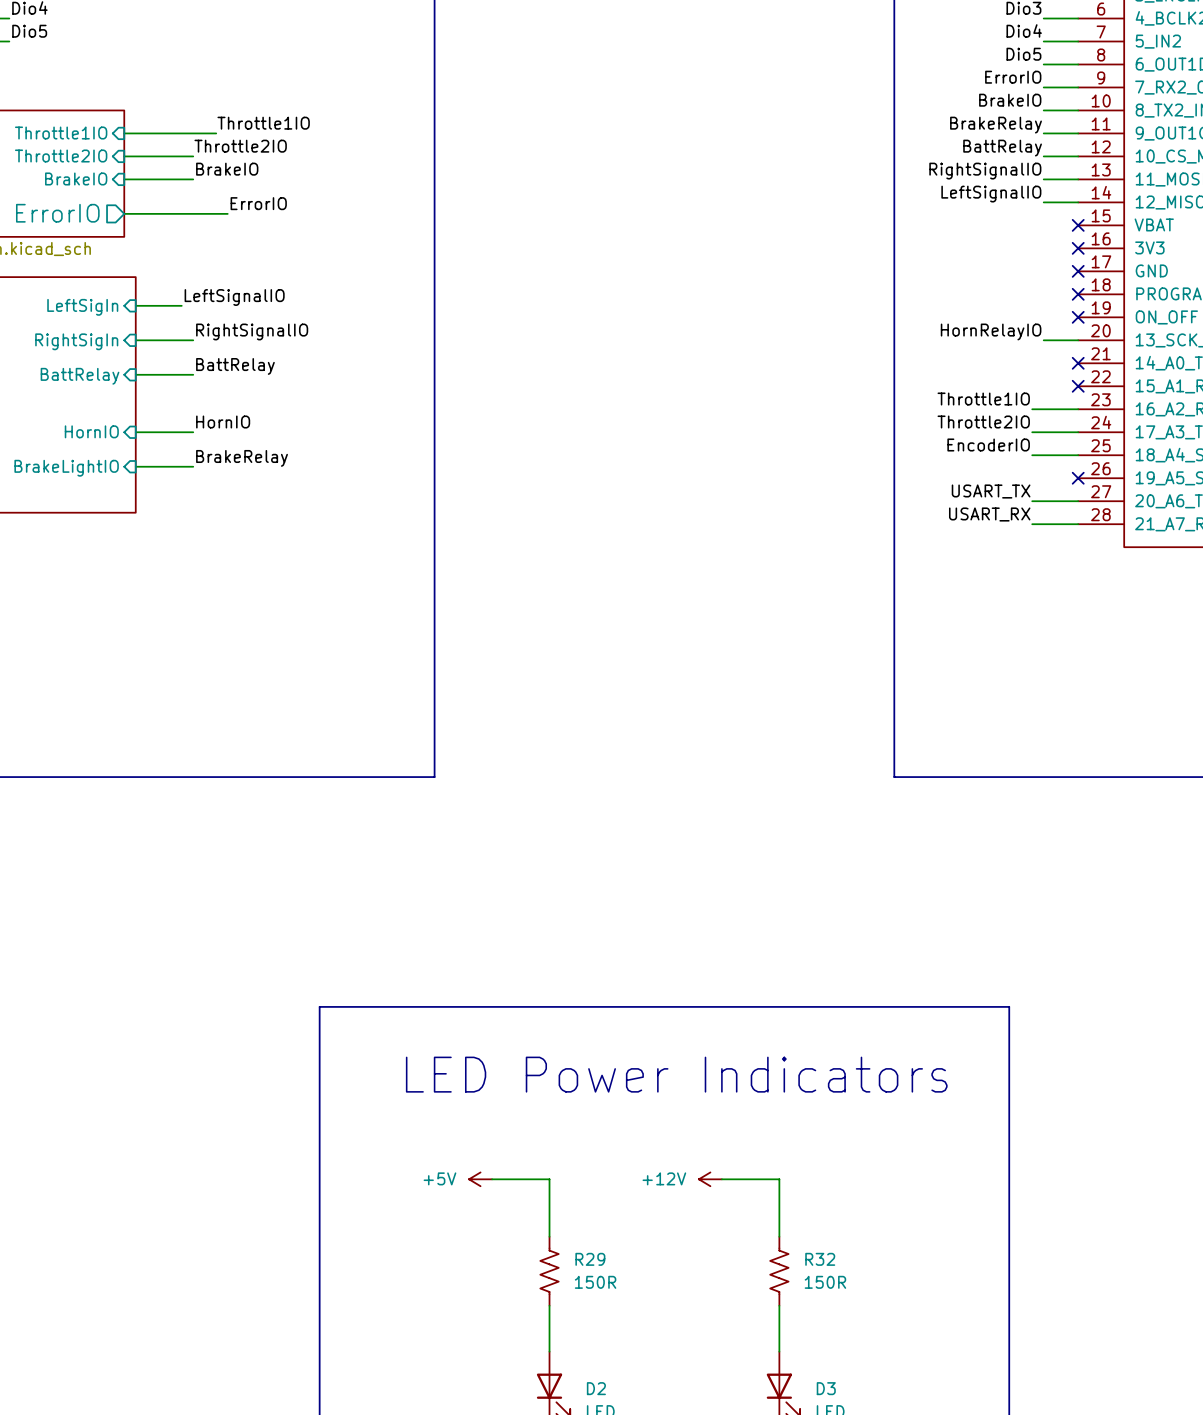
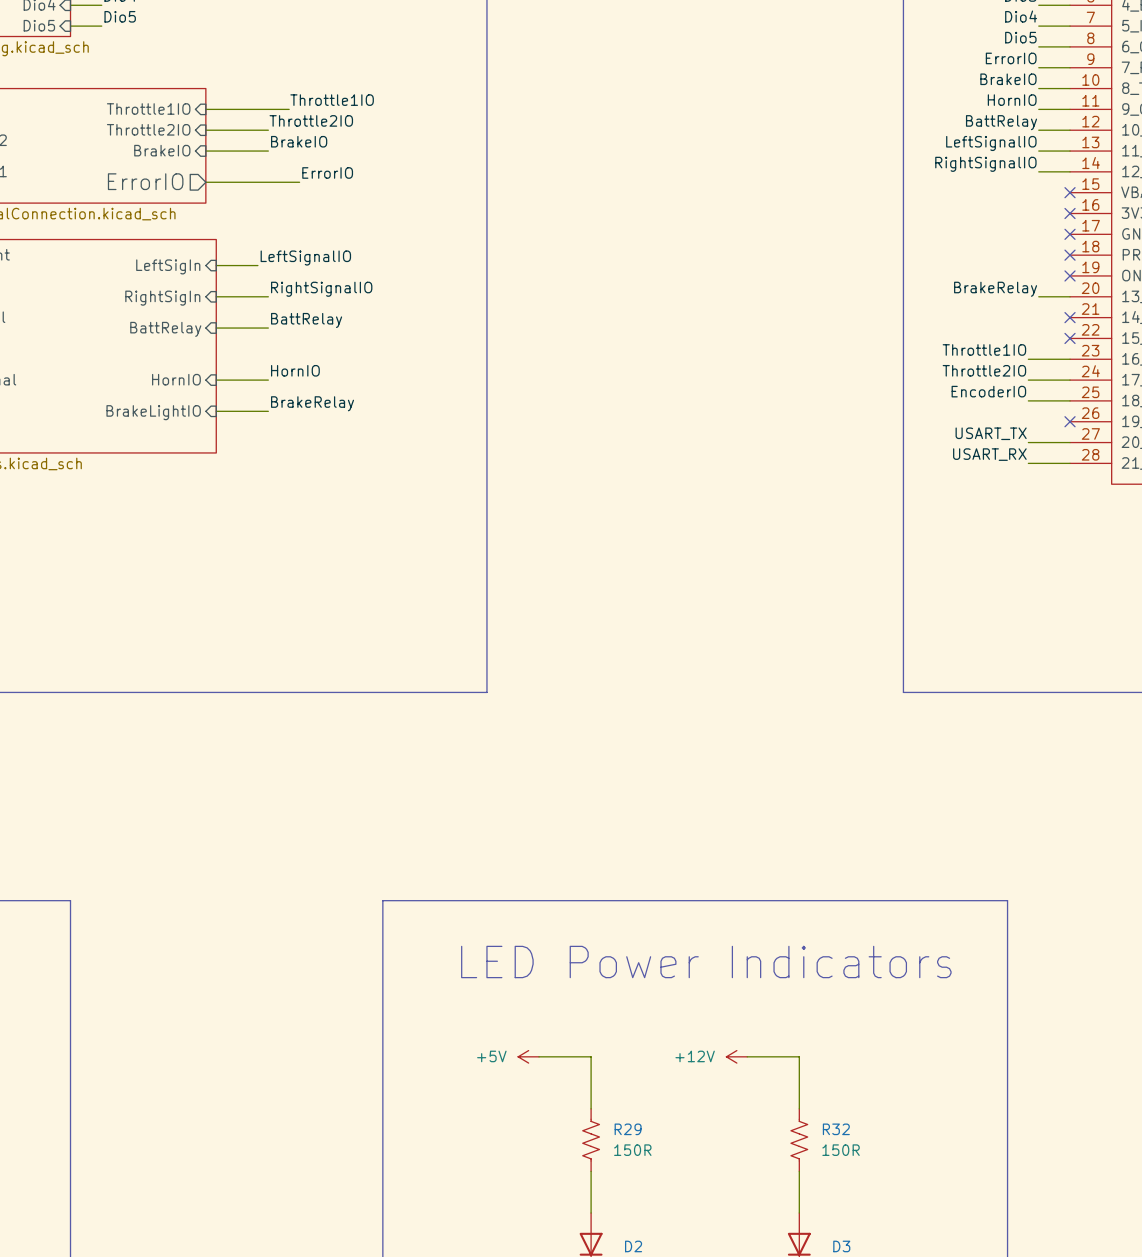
label: BrakeRelay (996, 125) -> HornIO (1012, 100)
label: RightSignalIO (985, 171) -> LeftSignalIO (991, 143)
label: LeftSignalIO (991, 194) -> RightSignalIO (985, 164)
label: HornRelayIO (991, 331) -> BrakeRelay (995, 289)

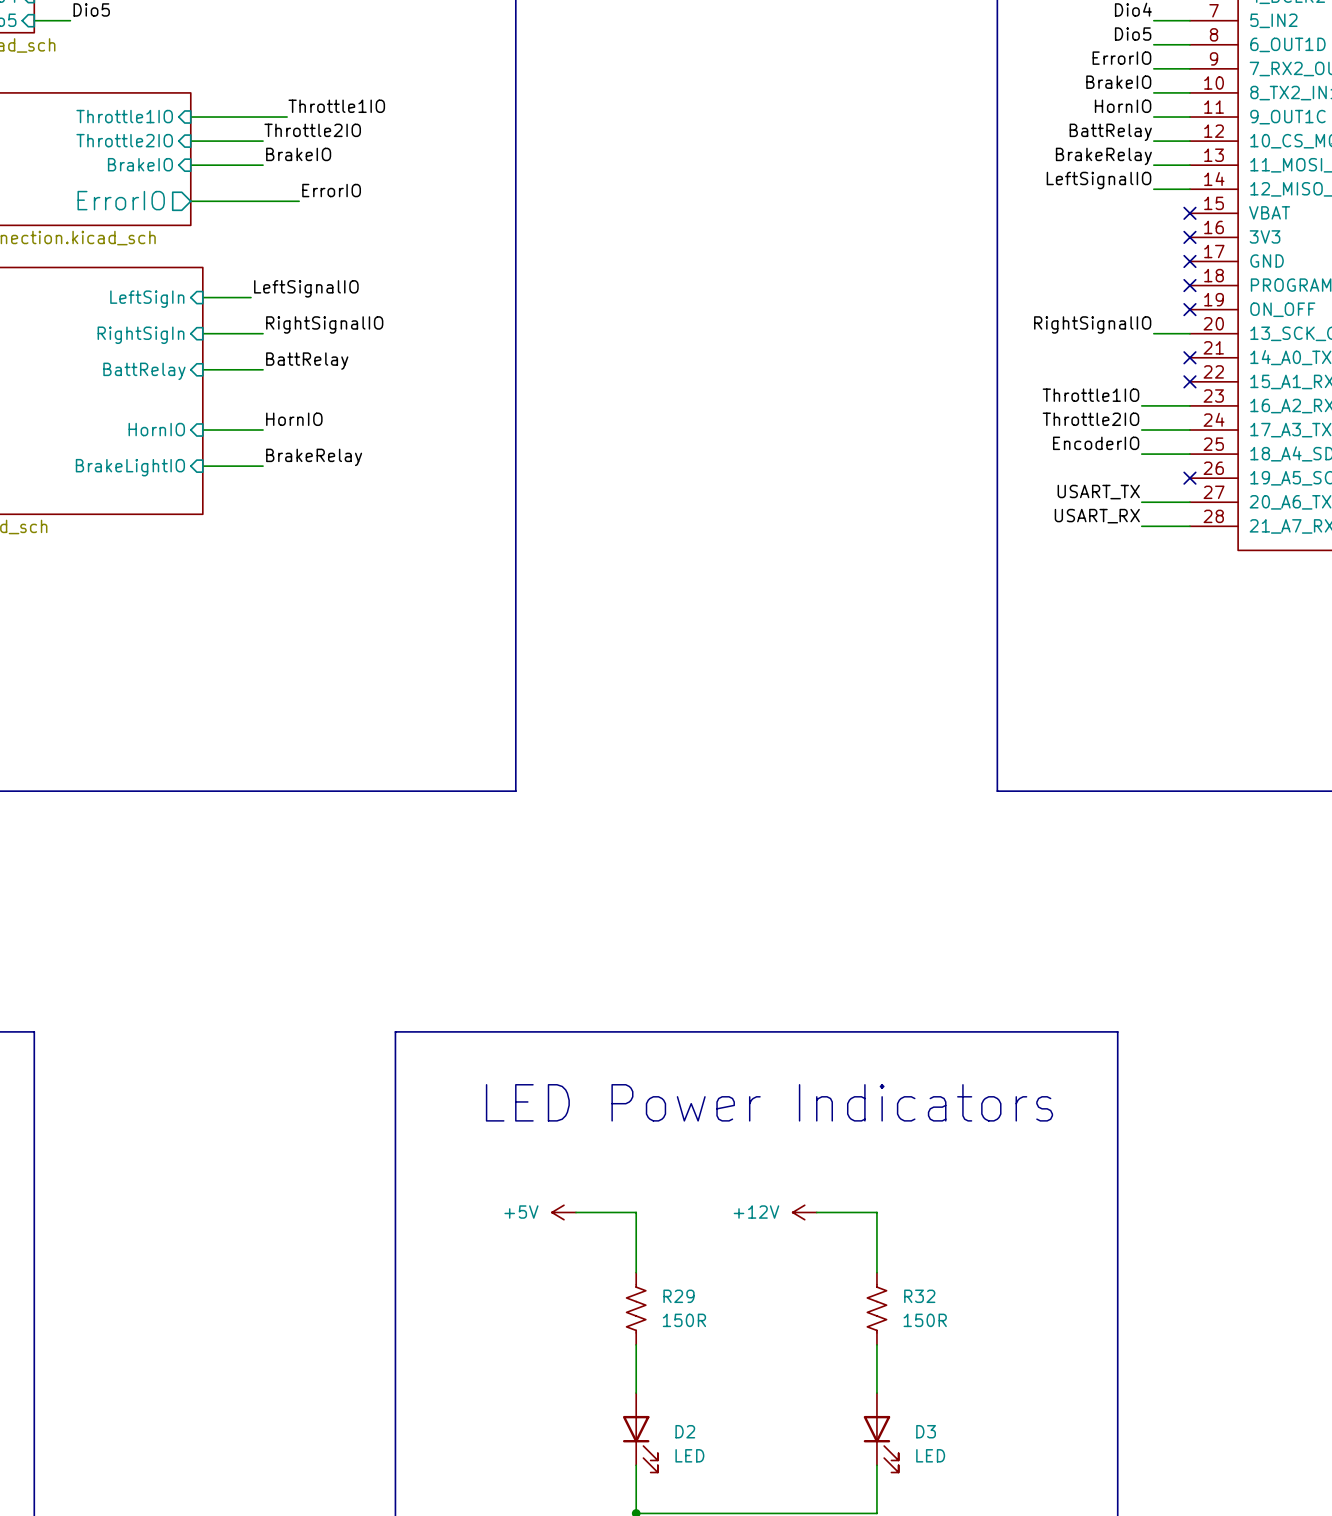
label: LeftSignalIO (991, 143) -> BrakeRelay (1103, 156)
label: RightSignalIO (985, 164) -> LeftSignalIO (1099, 180)
label: BrakeRelay (995, 289) -> RightSignalIO (1092, 324)

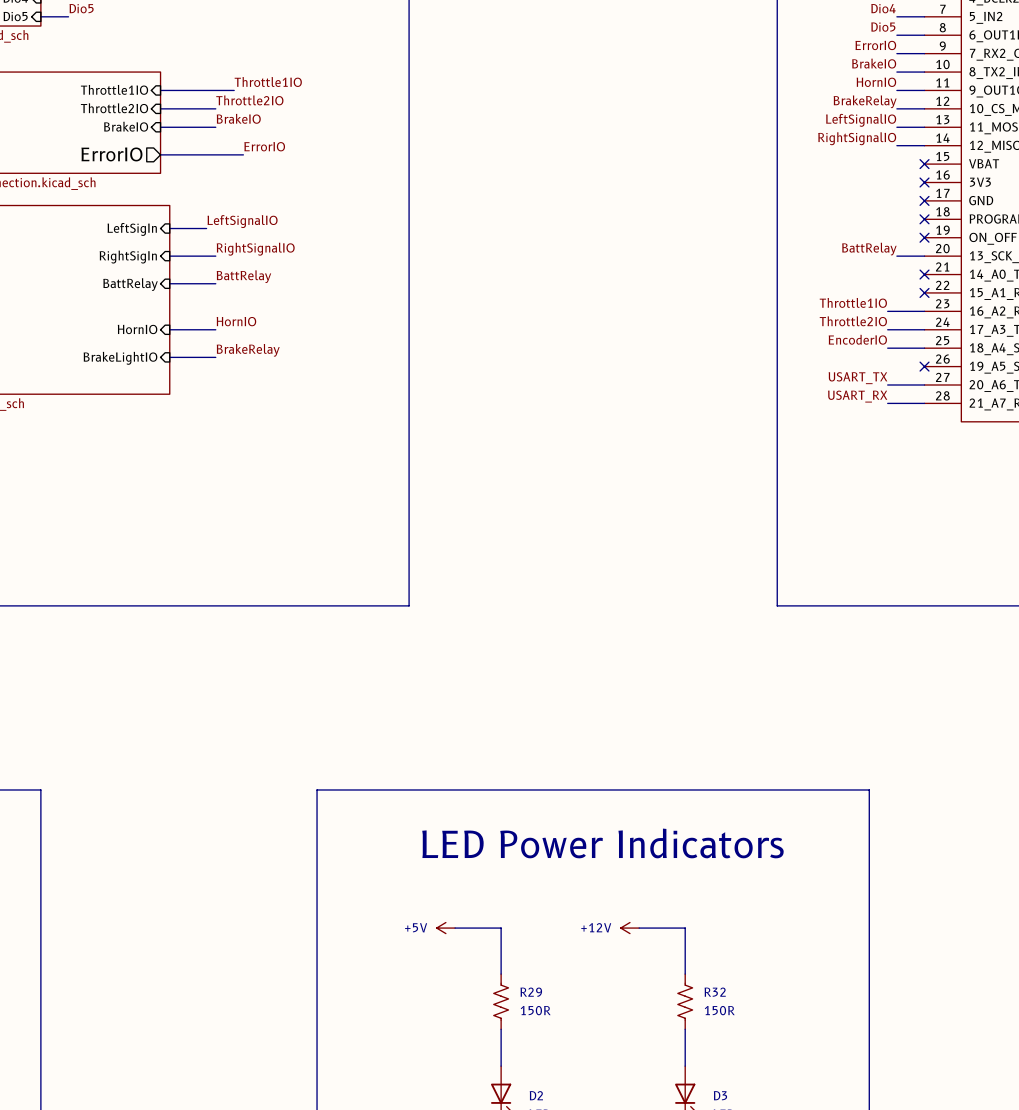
label: BattRelay (1110, 132) -> BrakeRelay (865, 101)
label: BrakeRelay (1103, 156) -> LeftSignalIO (861, 120)
label: LeftSignalIO (1099, 180) -> RightSignalIO (857, 138)
label: RightSignalIO (1092, 324) -> BattRelay (869, 249)

